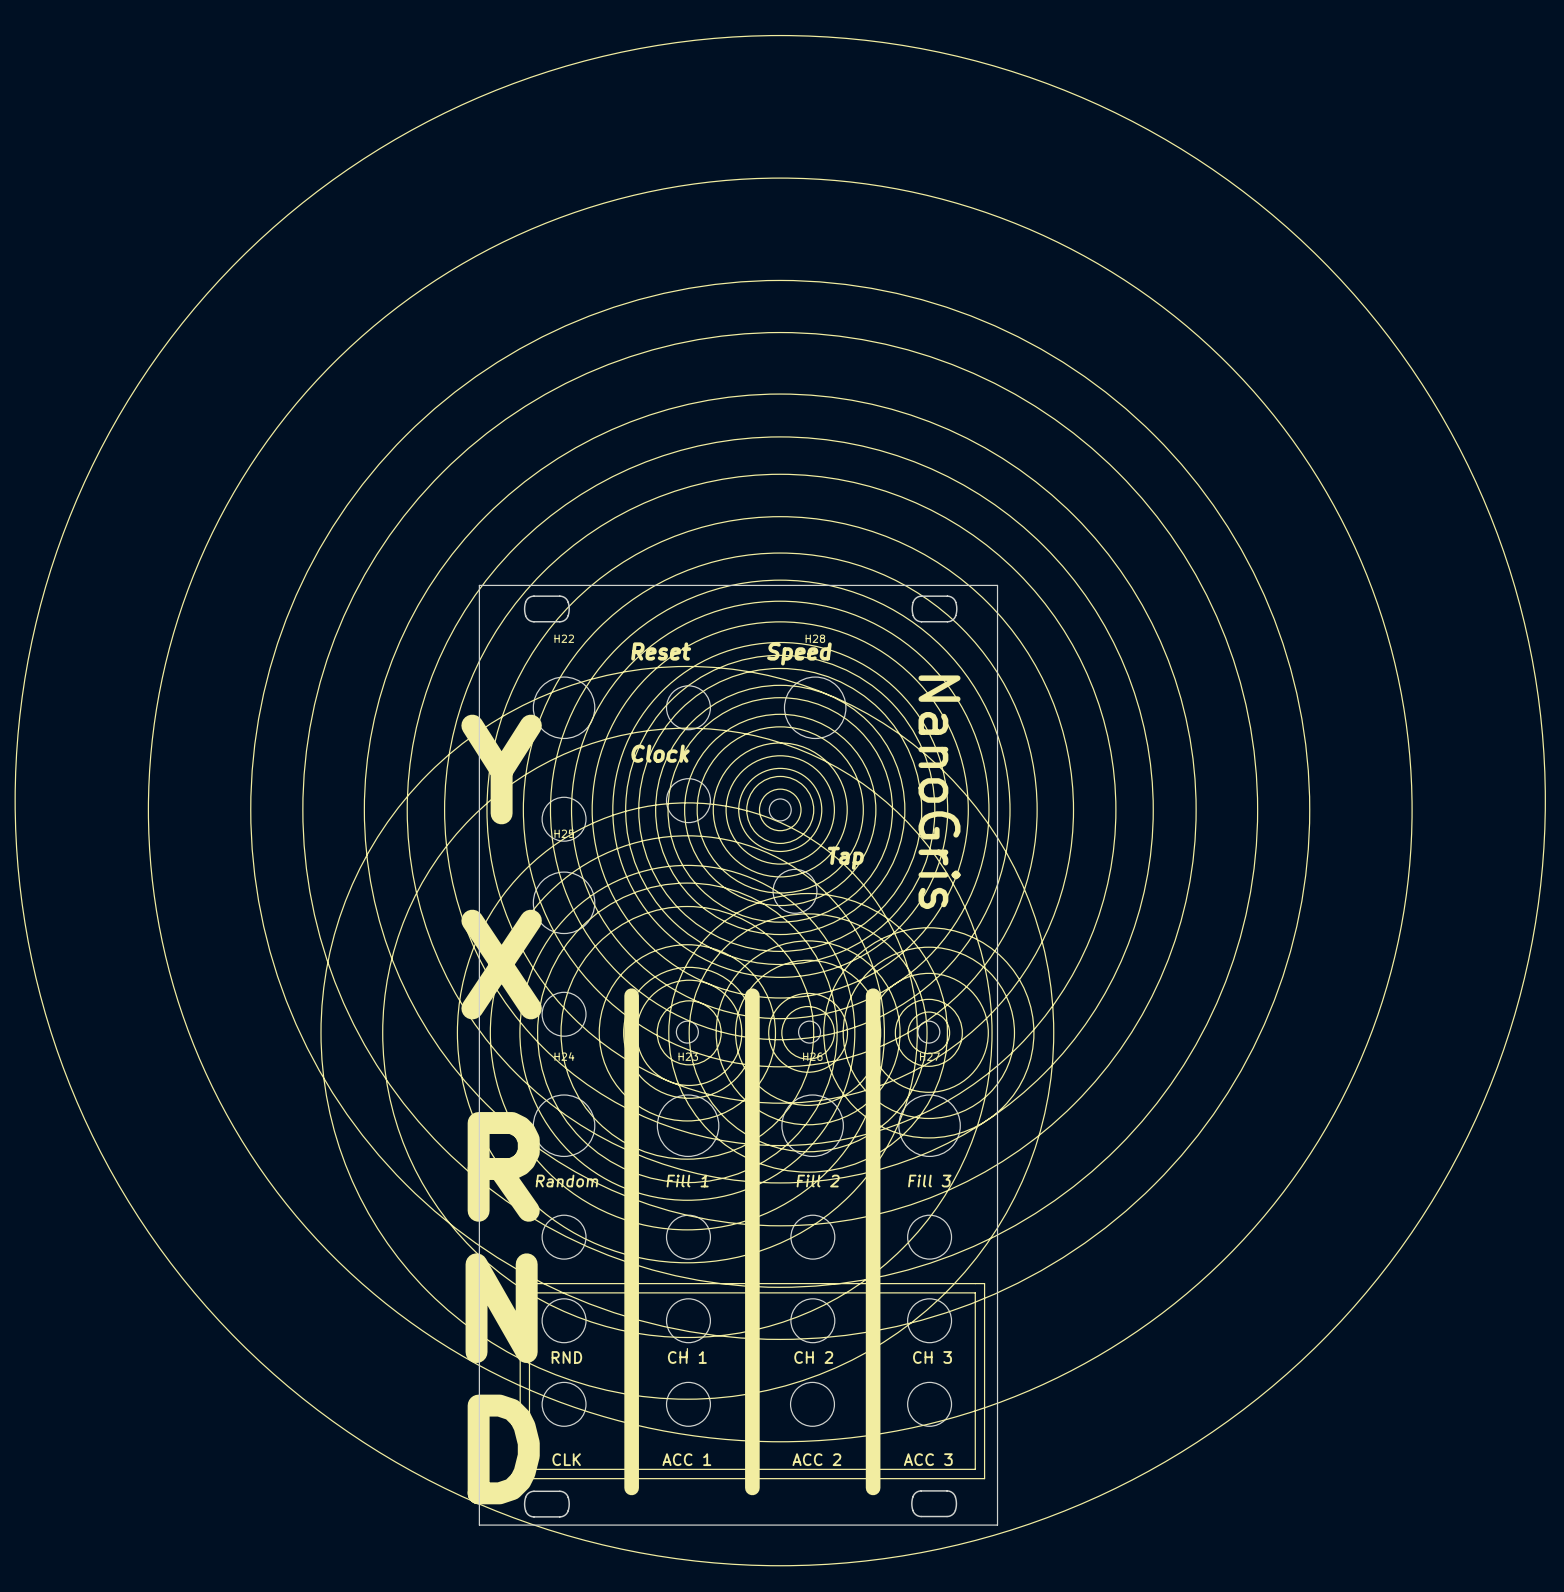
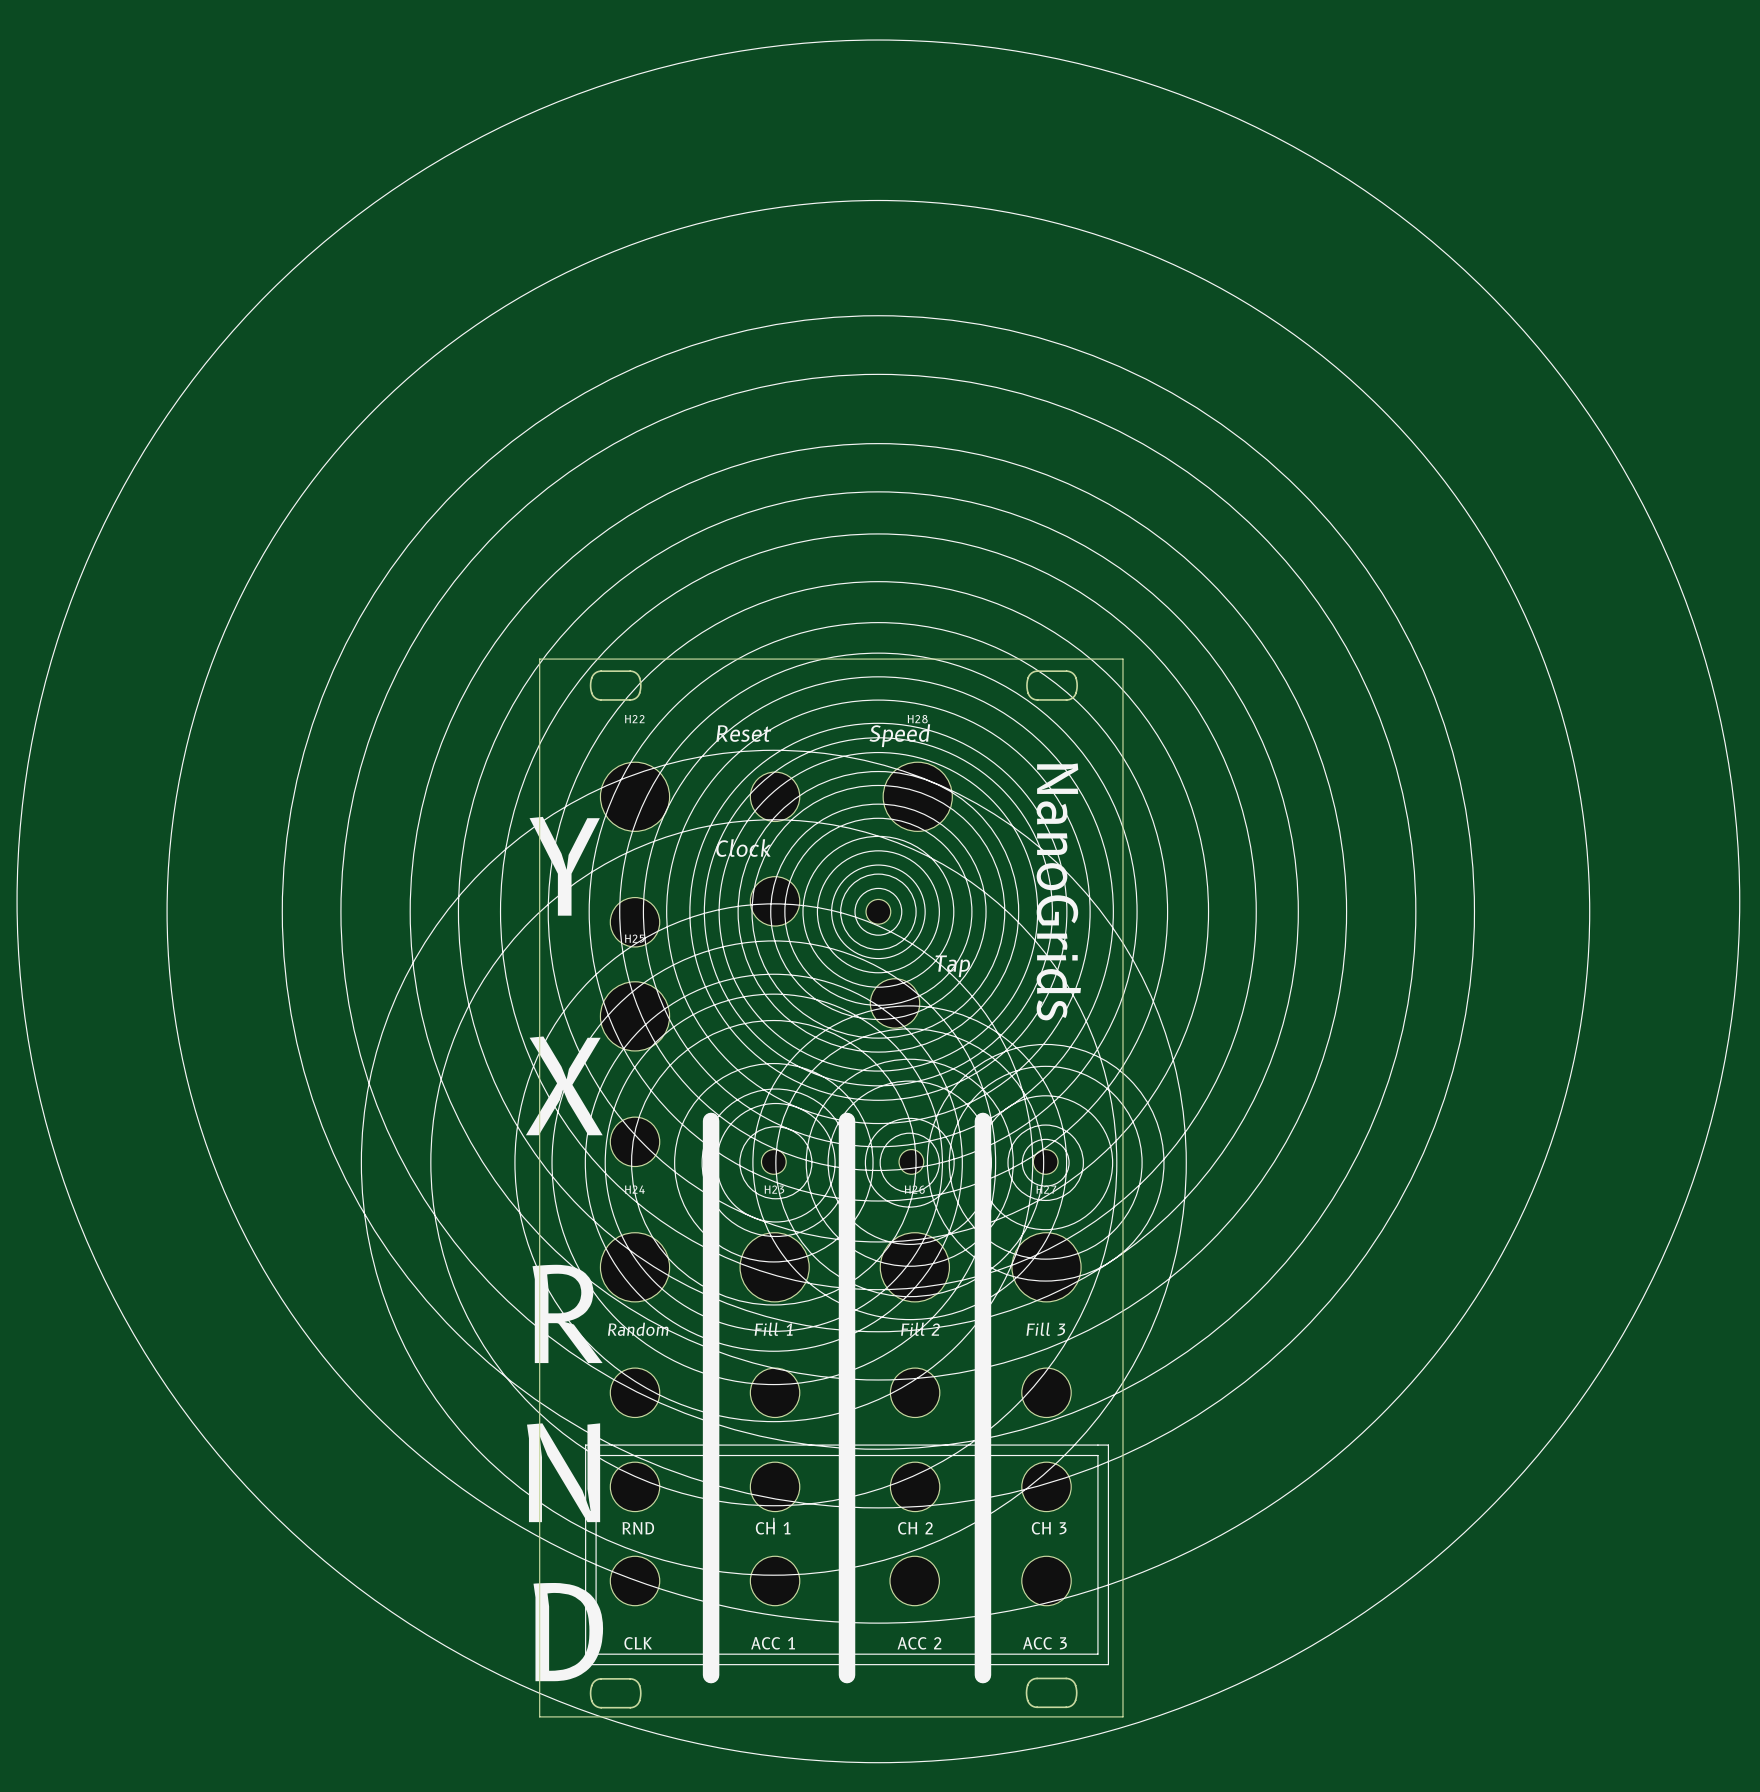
text: NanoGris (939, 792) -> NanoGrids (1058, 891)

